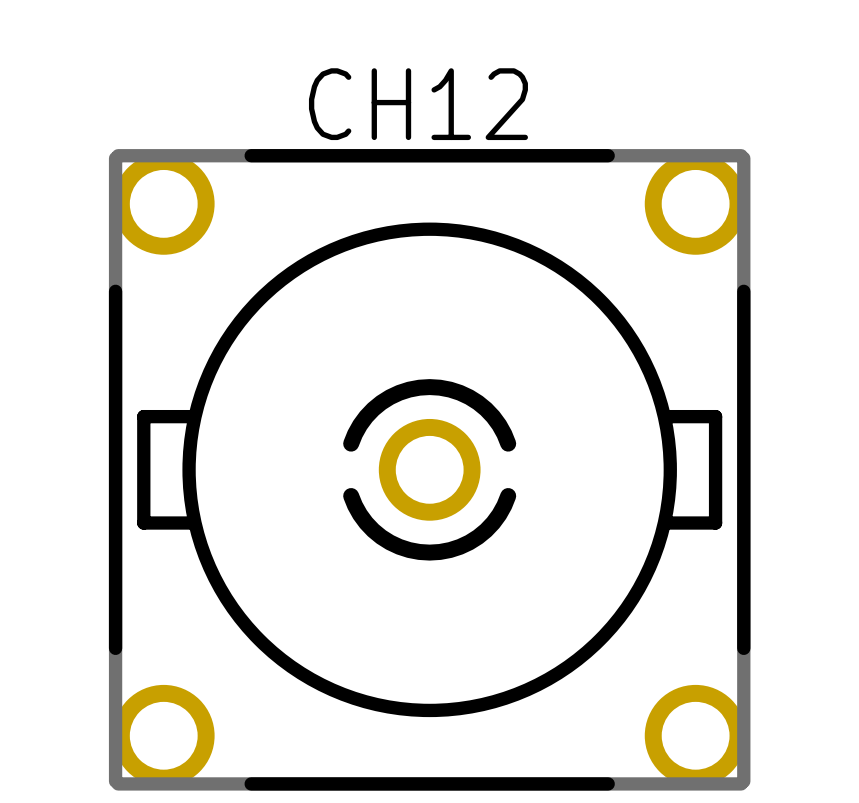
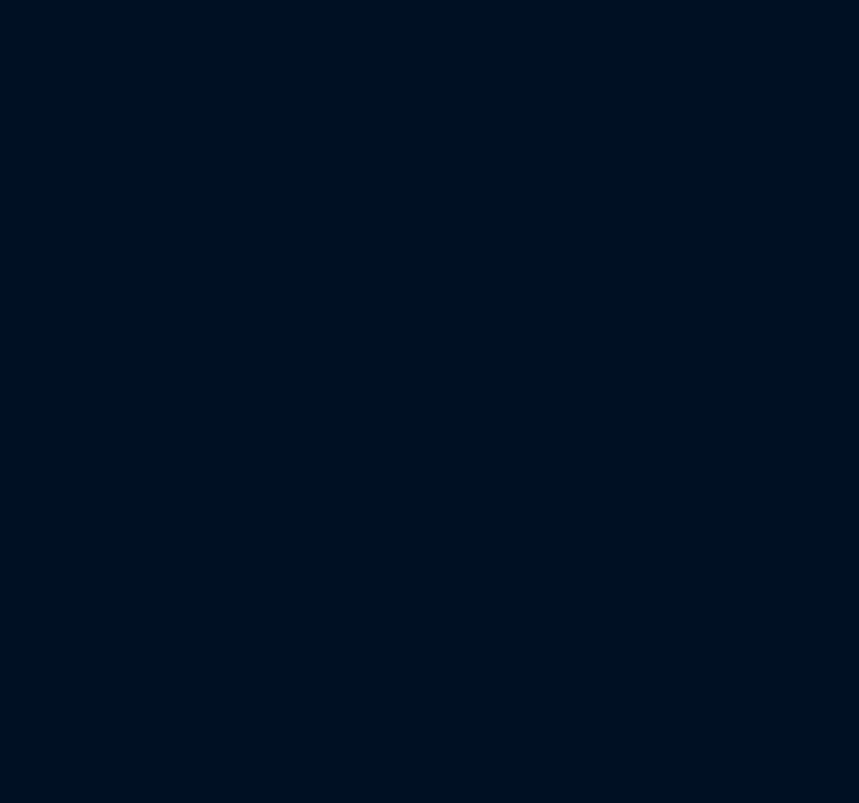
CH12: (429, 469) -> none

